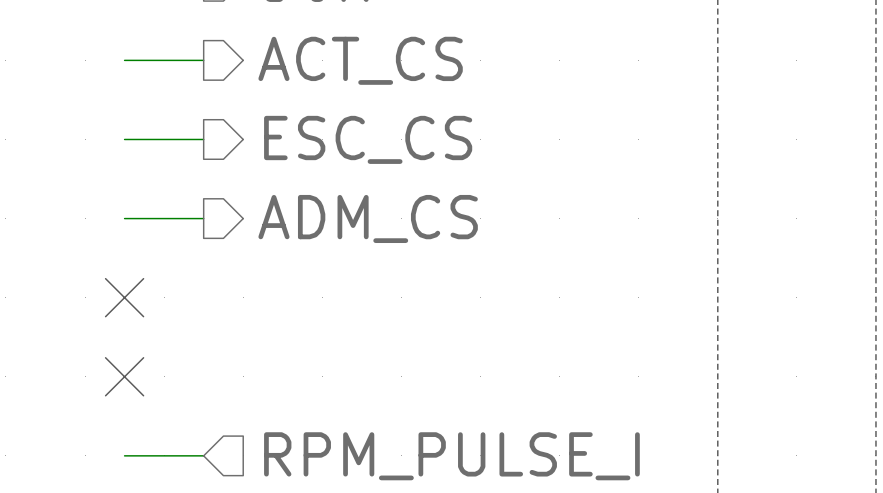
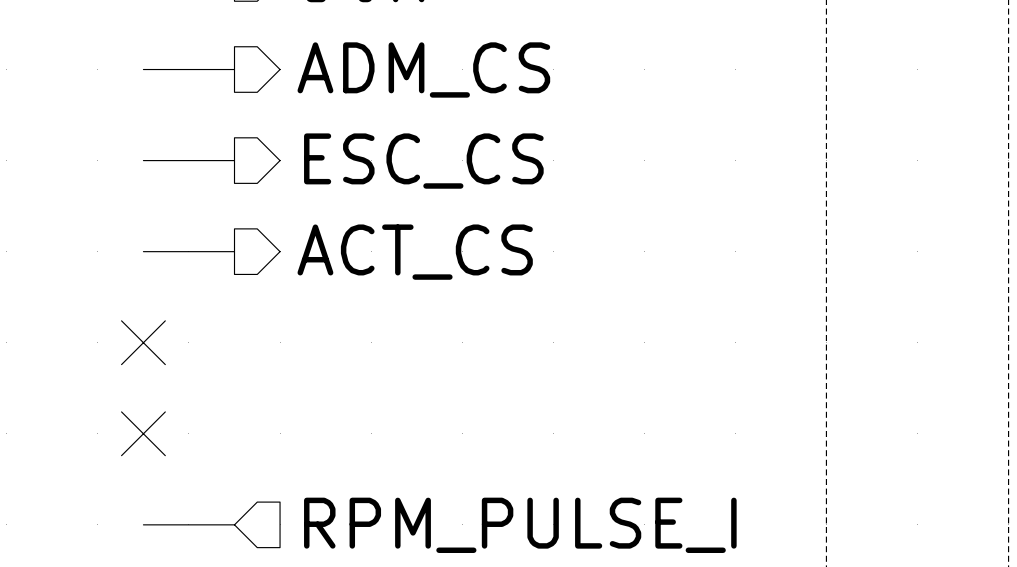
hierarchical label: ACT_CS (360, 60) -> ADM_CS (423, 69)
hierarchical label: ADM_CS (368, 218) -> ACT_CS (415, 252)

